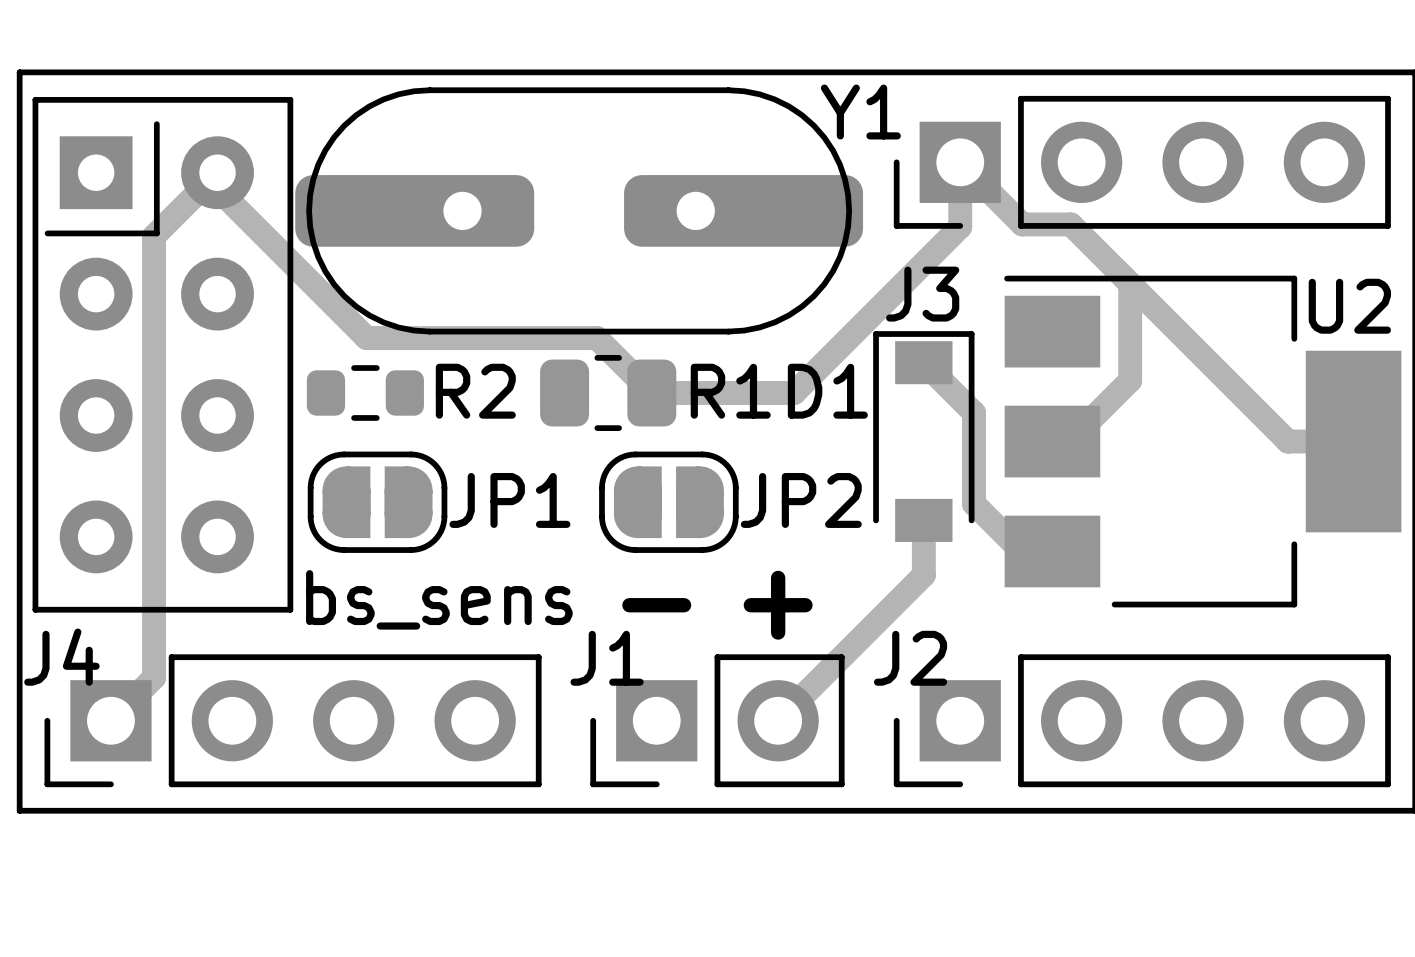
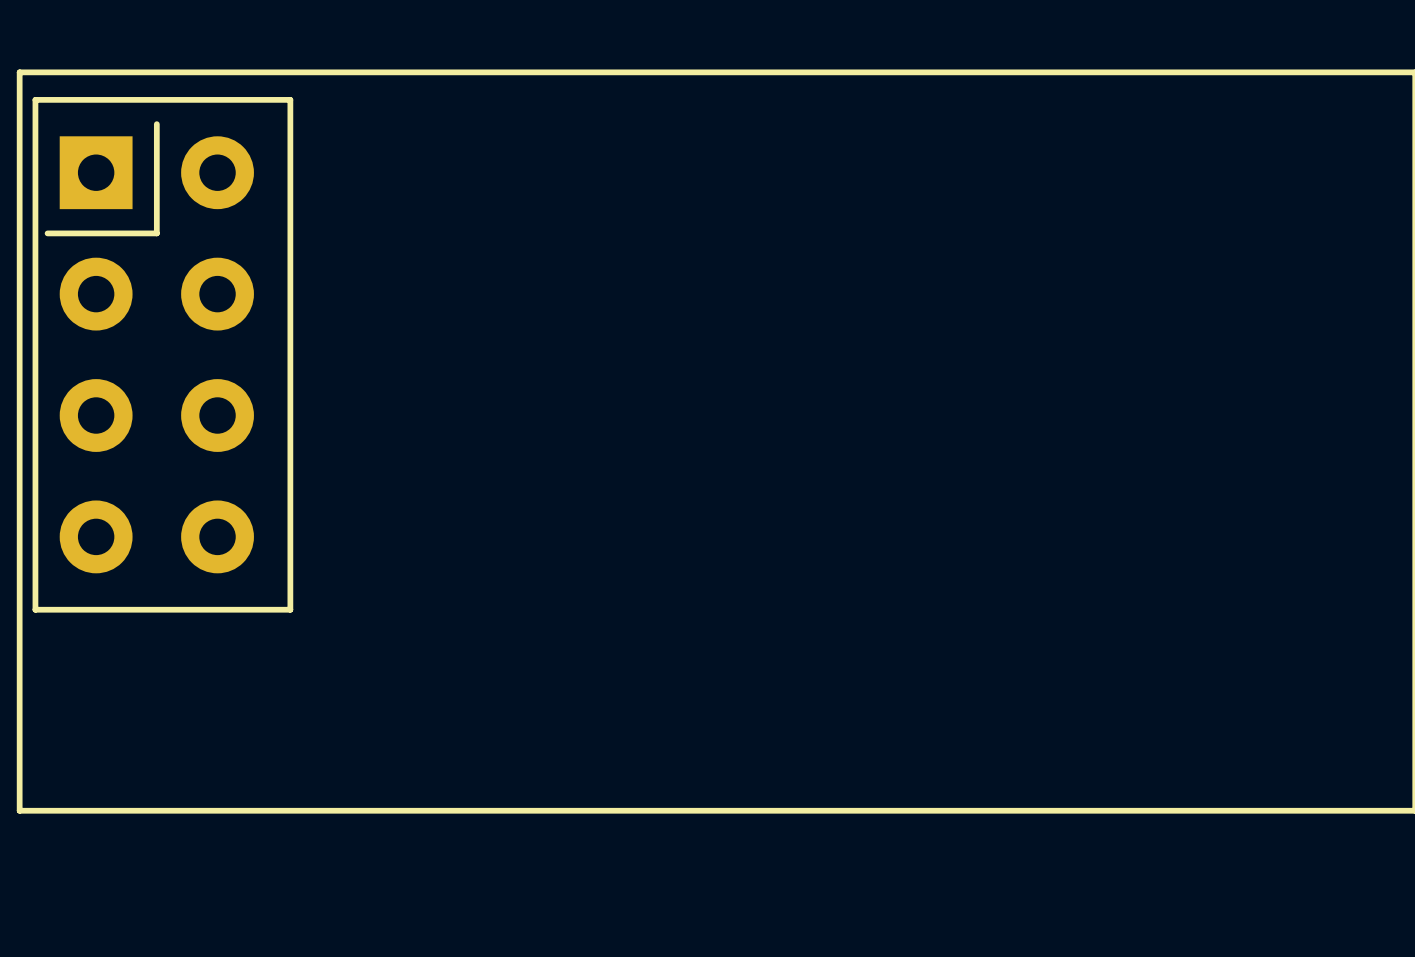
J3: (1142, 162) -> none
Y1: (579, 210) -> none
track: (1130, 283) (1130, 380) (1069, 441) (1052, 441) -> none
track: (923, 362) (973, 412) (973, 503) (1021, 551) (1052, 551) -> none
R2: (365, 392) -> none
R1: (608, 392) -> none
D1: (923, 436) -> none
U2: (1202, 441) -> none
track: (1353, 441) (1288, 441) (1070, 224) (1022, 224) (960, 162) (960, 226) (794, 392) (651, 392) (596, 338) (366, 338) (217, 188) (217, 172) (154, 236) (154, 677) (110, 720) (134, 720) -> none
JP1: (377, 502) -> none
JP2: (668, 502) -> none
track: (923, 520) (923, 575) (778, 720) -> none
text: bs_sens (439, 599) -> none
text: - (656, 605) -> none
text: + (778, 605) -> none
J4: (293, 720) -> none
J1: (717, 720) -> none
J2: (1142, 720) -> none

